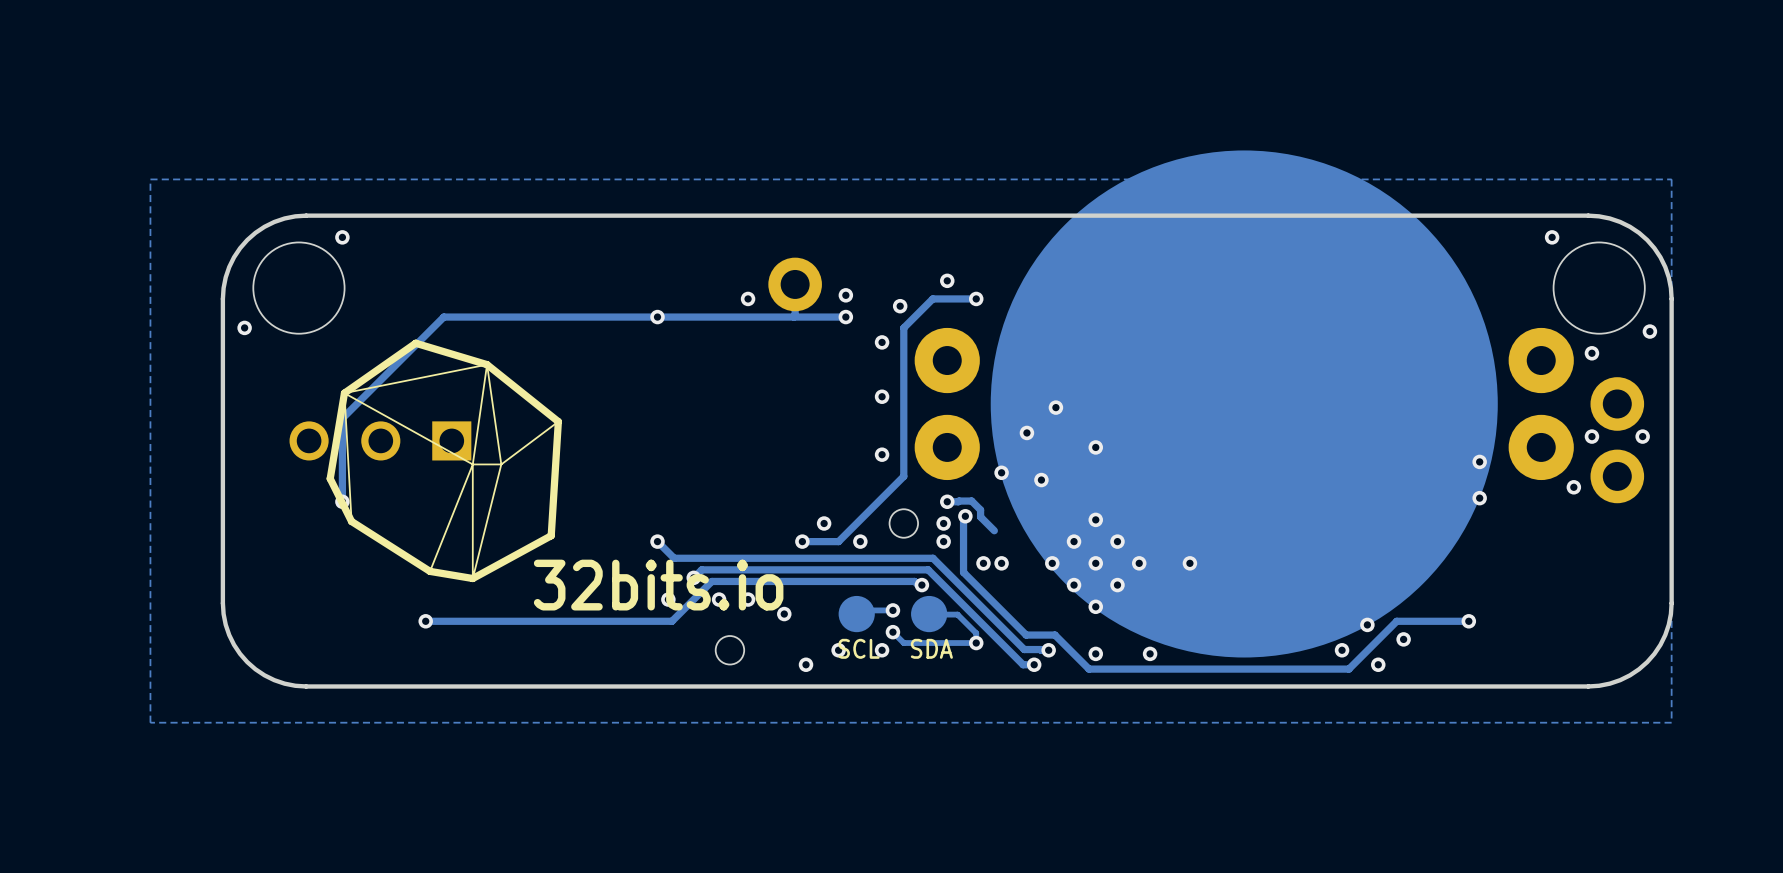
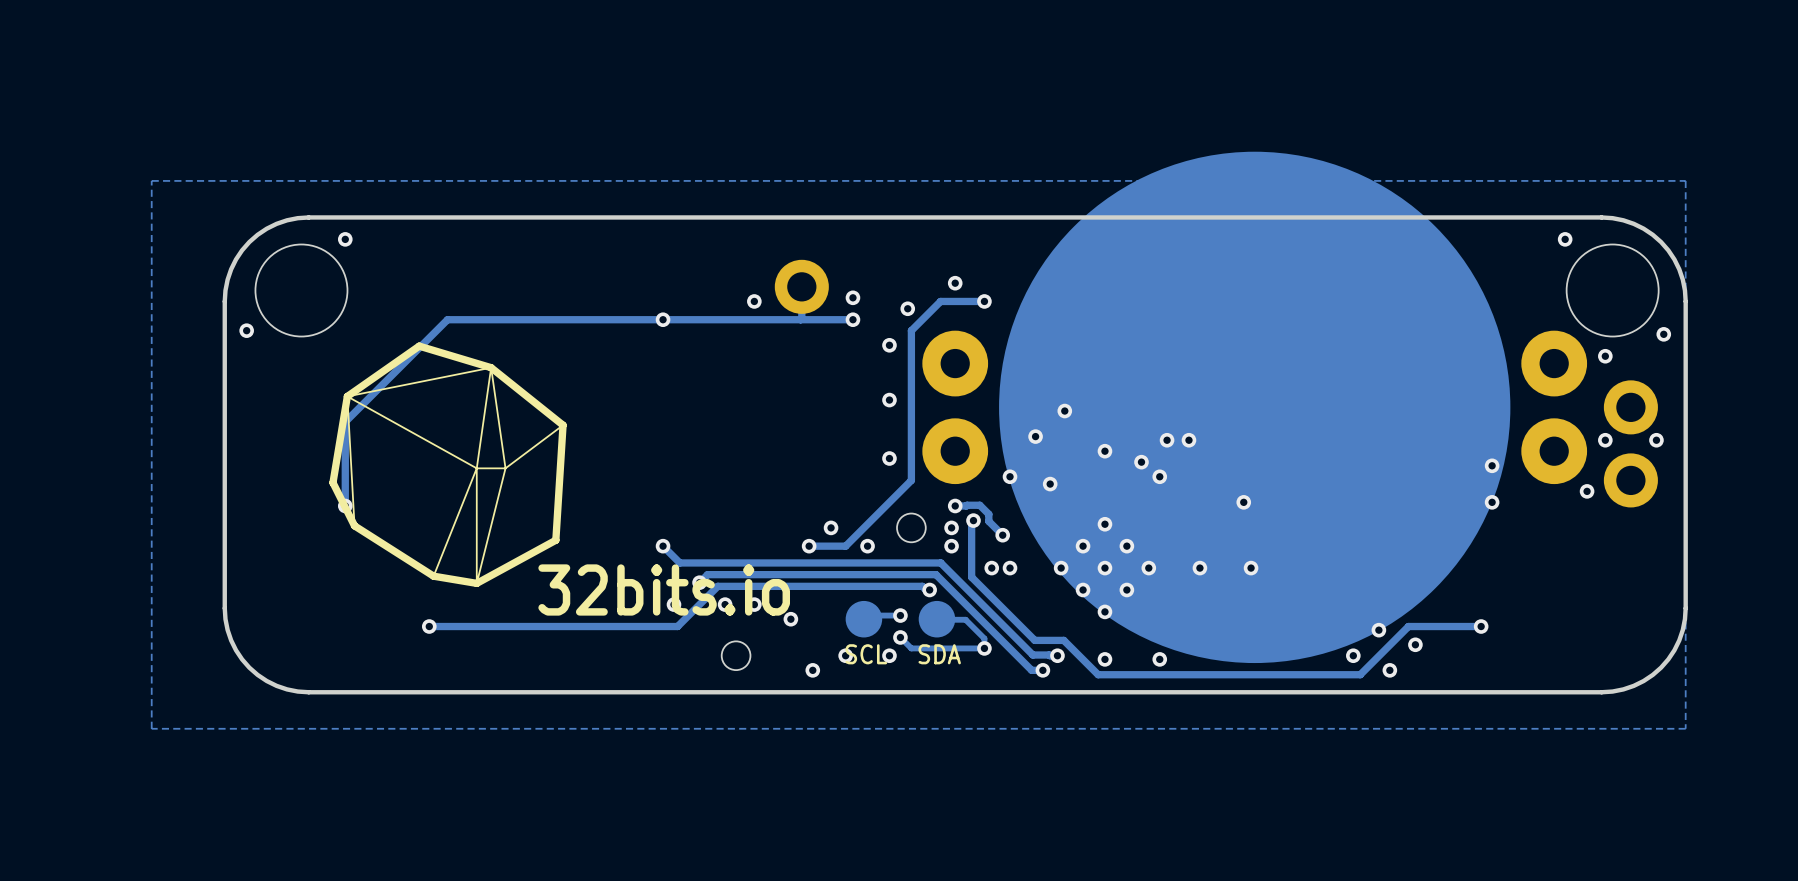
via: none -> (1167, 440)
via: none -> (1188, 440)
part: (380, 440) -> none
via: none -> (1141, 462)
via: none -> (1159, 476)
via: none -> (1243, 502)
via: none -> (1002, 535)
via: none -> (1251, 568)

